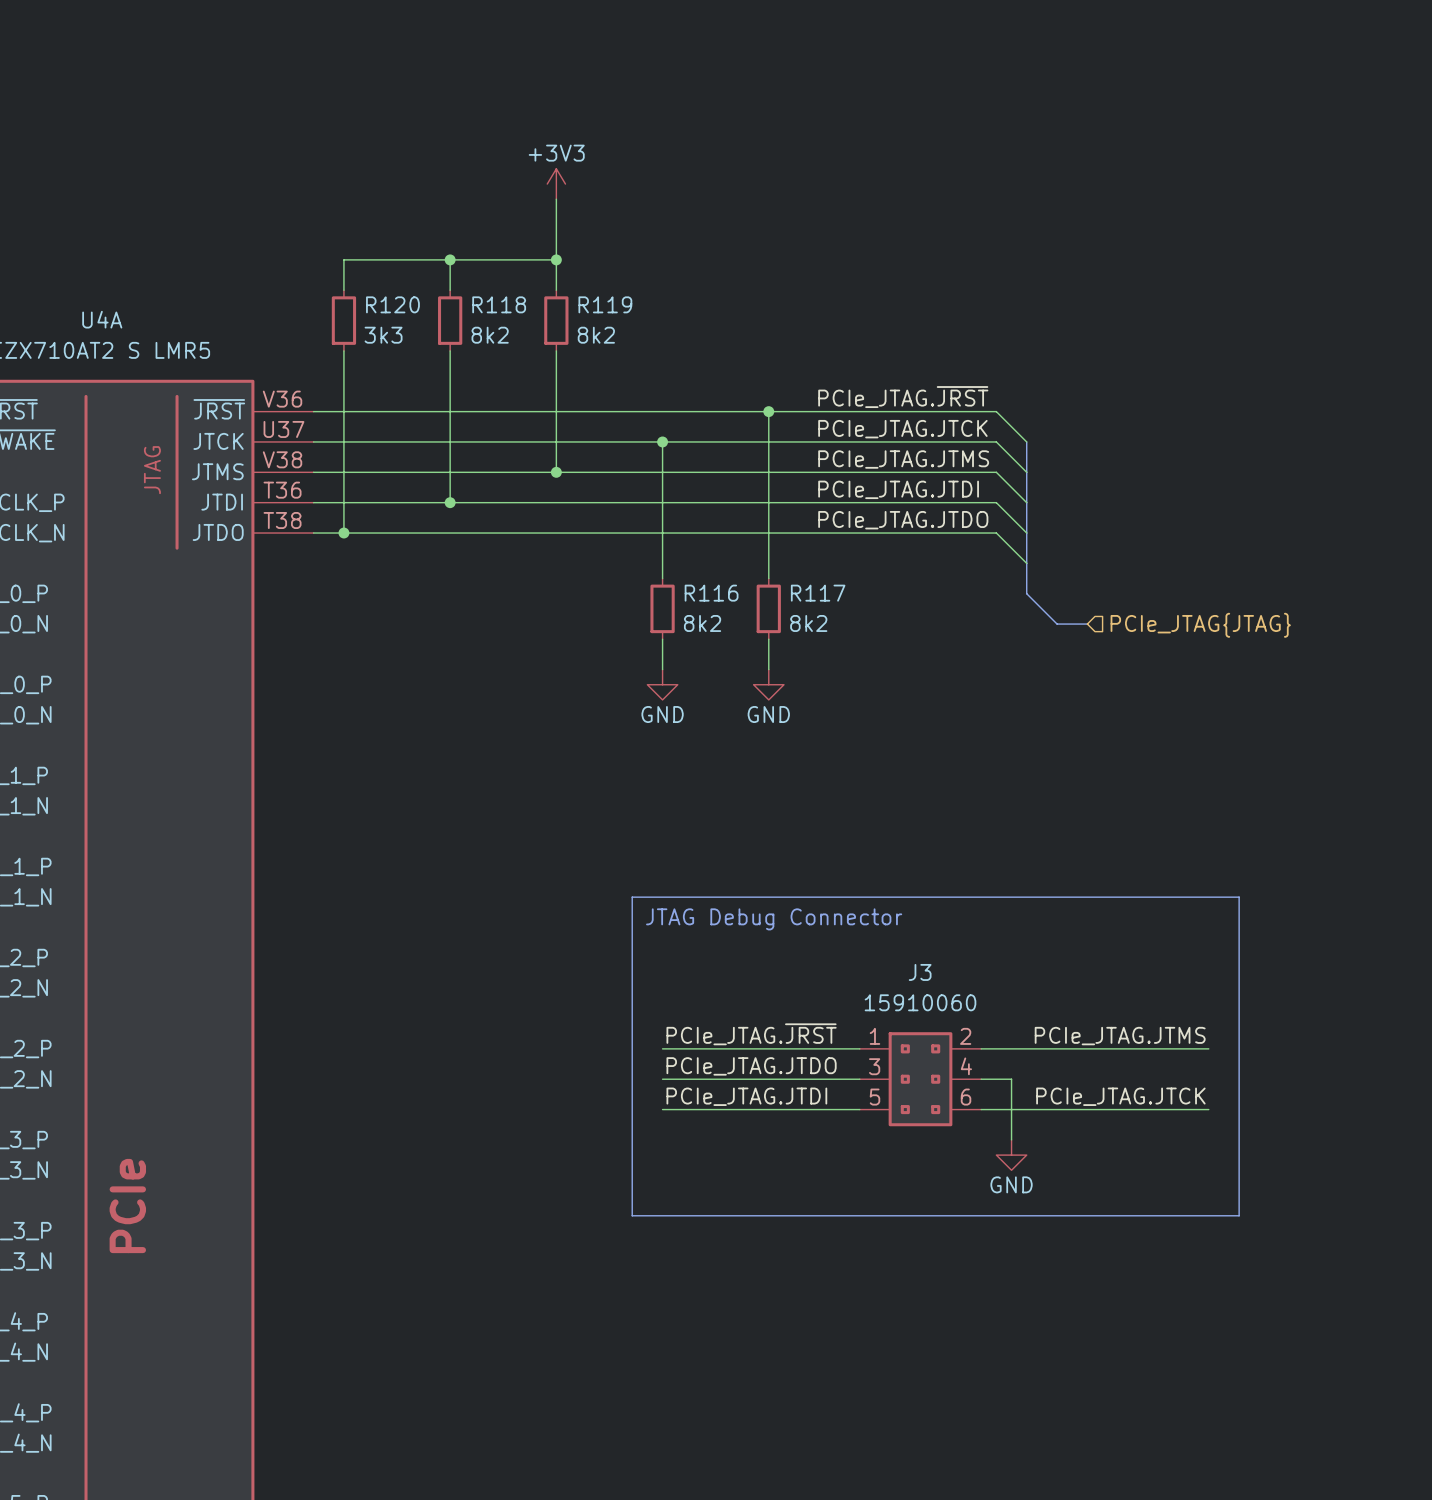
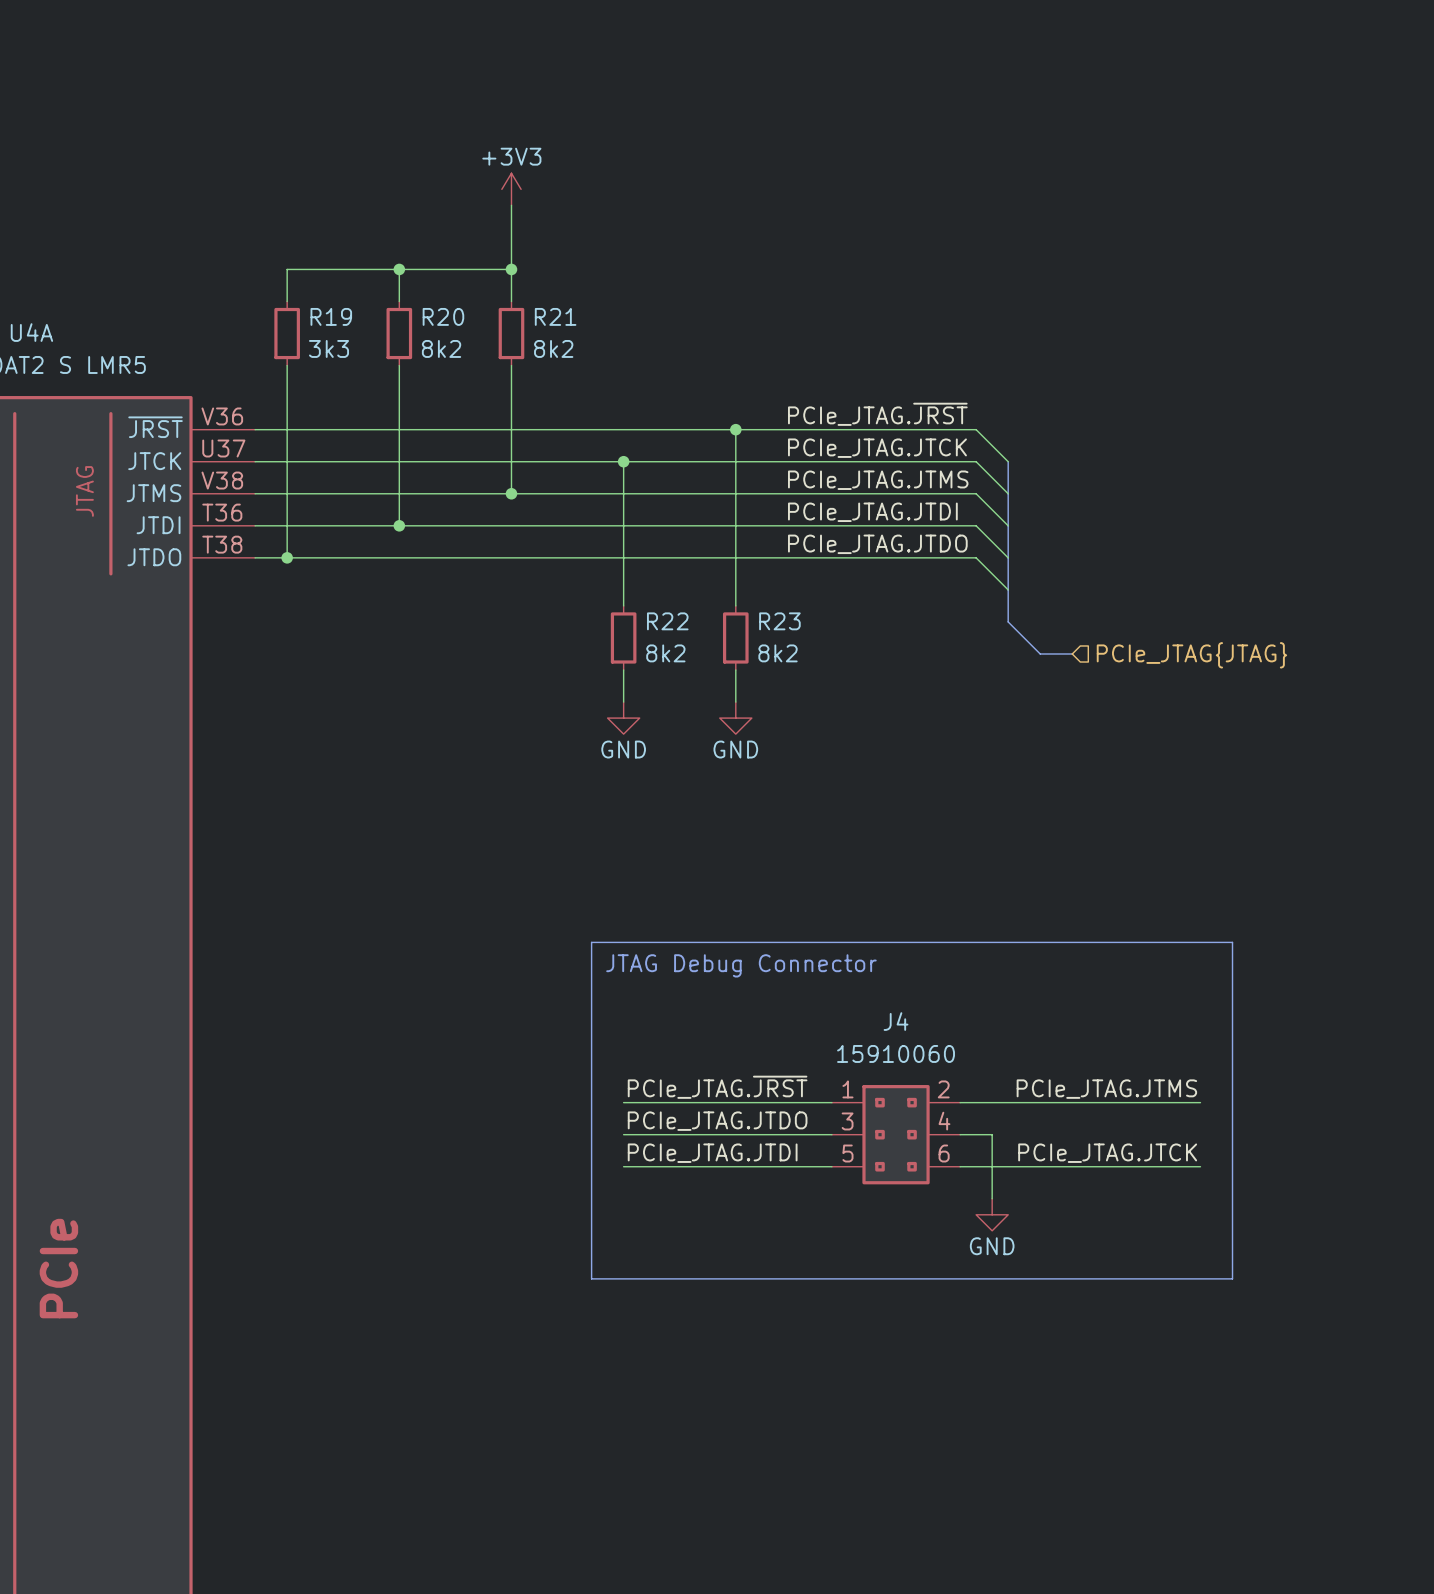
R120 name: R120 (392, 304) -> R19 (331, 316)
R118 name: R118 (499, 304) -> R20 (443, 316)
R119 name: R119 (605, 304) -> R21 (555, 316)
R116 name: R116 (711, 593) -> R22 (667, 621)
R117 name: R117 (818, 593) -> R23 (779, 621)
J3 name: J3 (920, 972) -> J4 (896, 1021)

